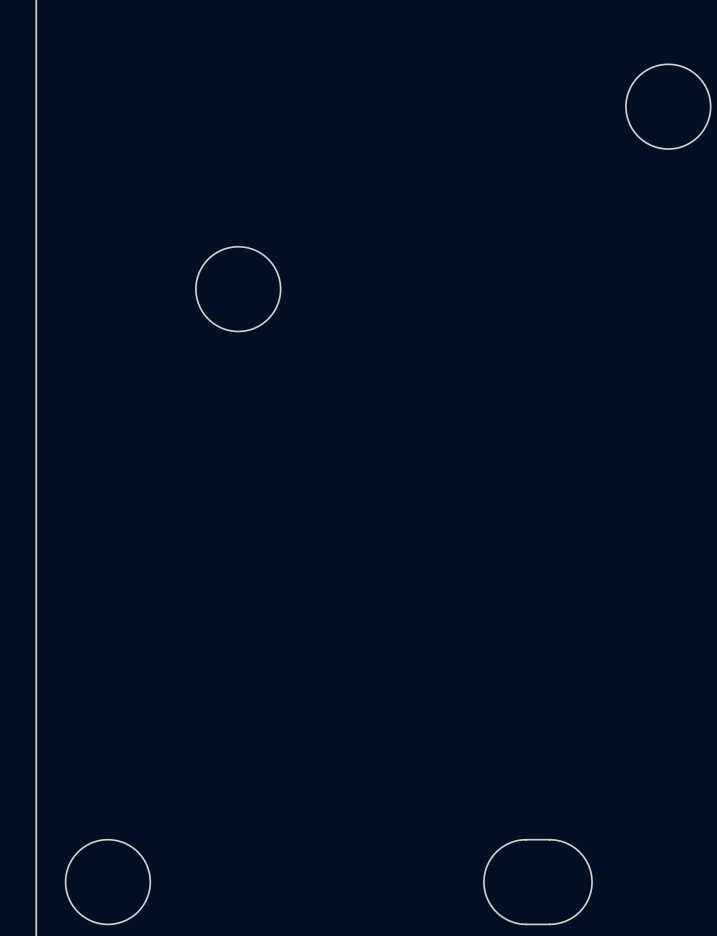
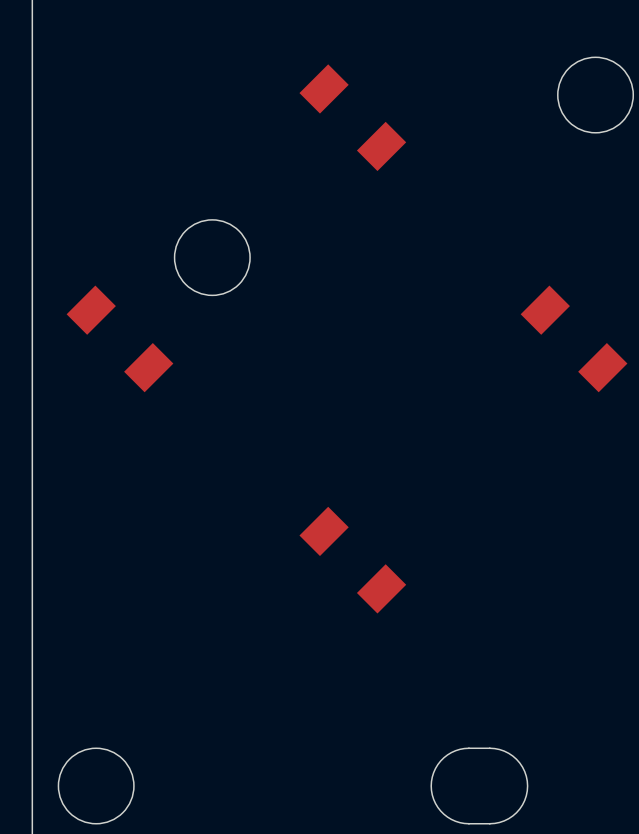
part: none -> (352, 117)
part: none -> (119, 338)
part: none -> (574, 338)
part: none -> (352, 560)

